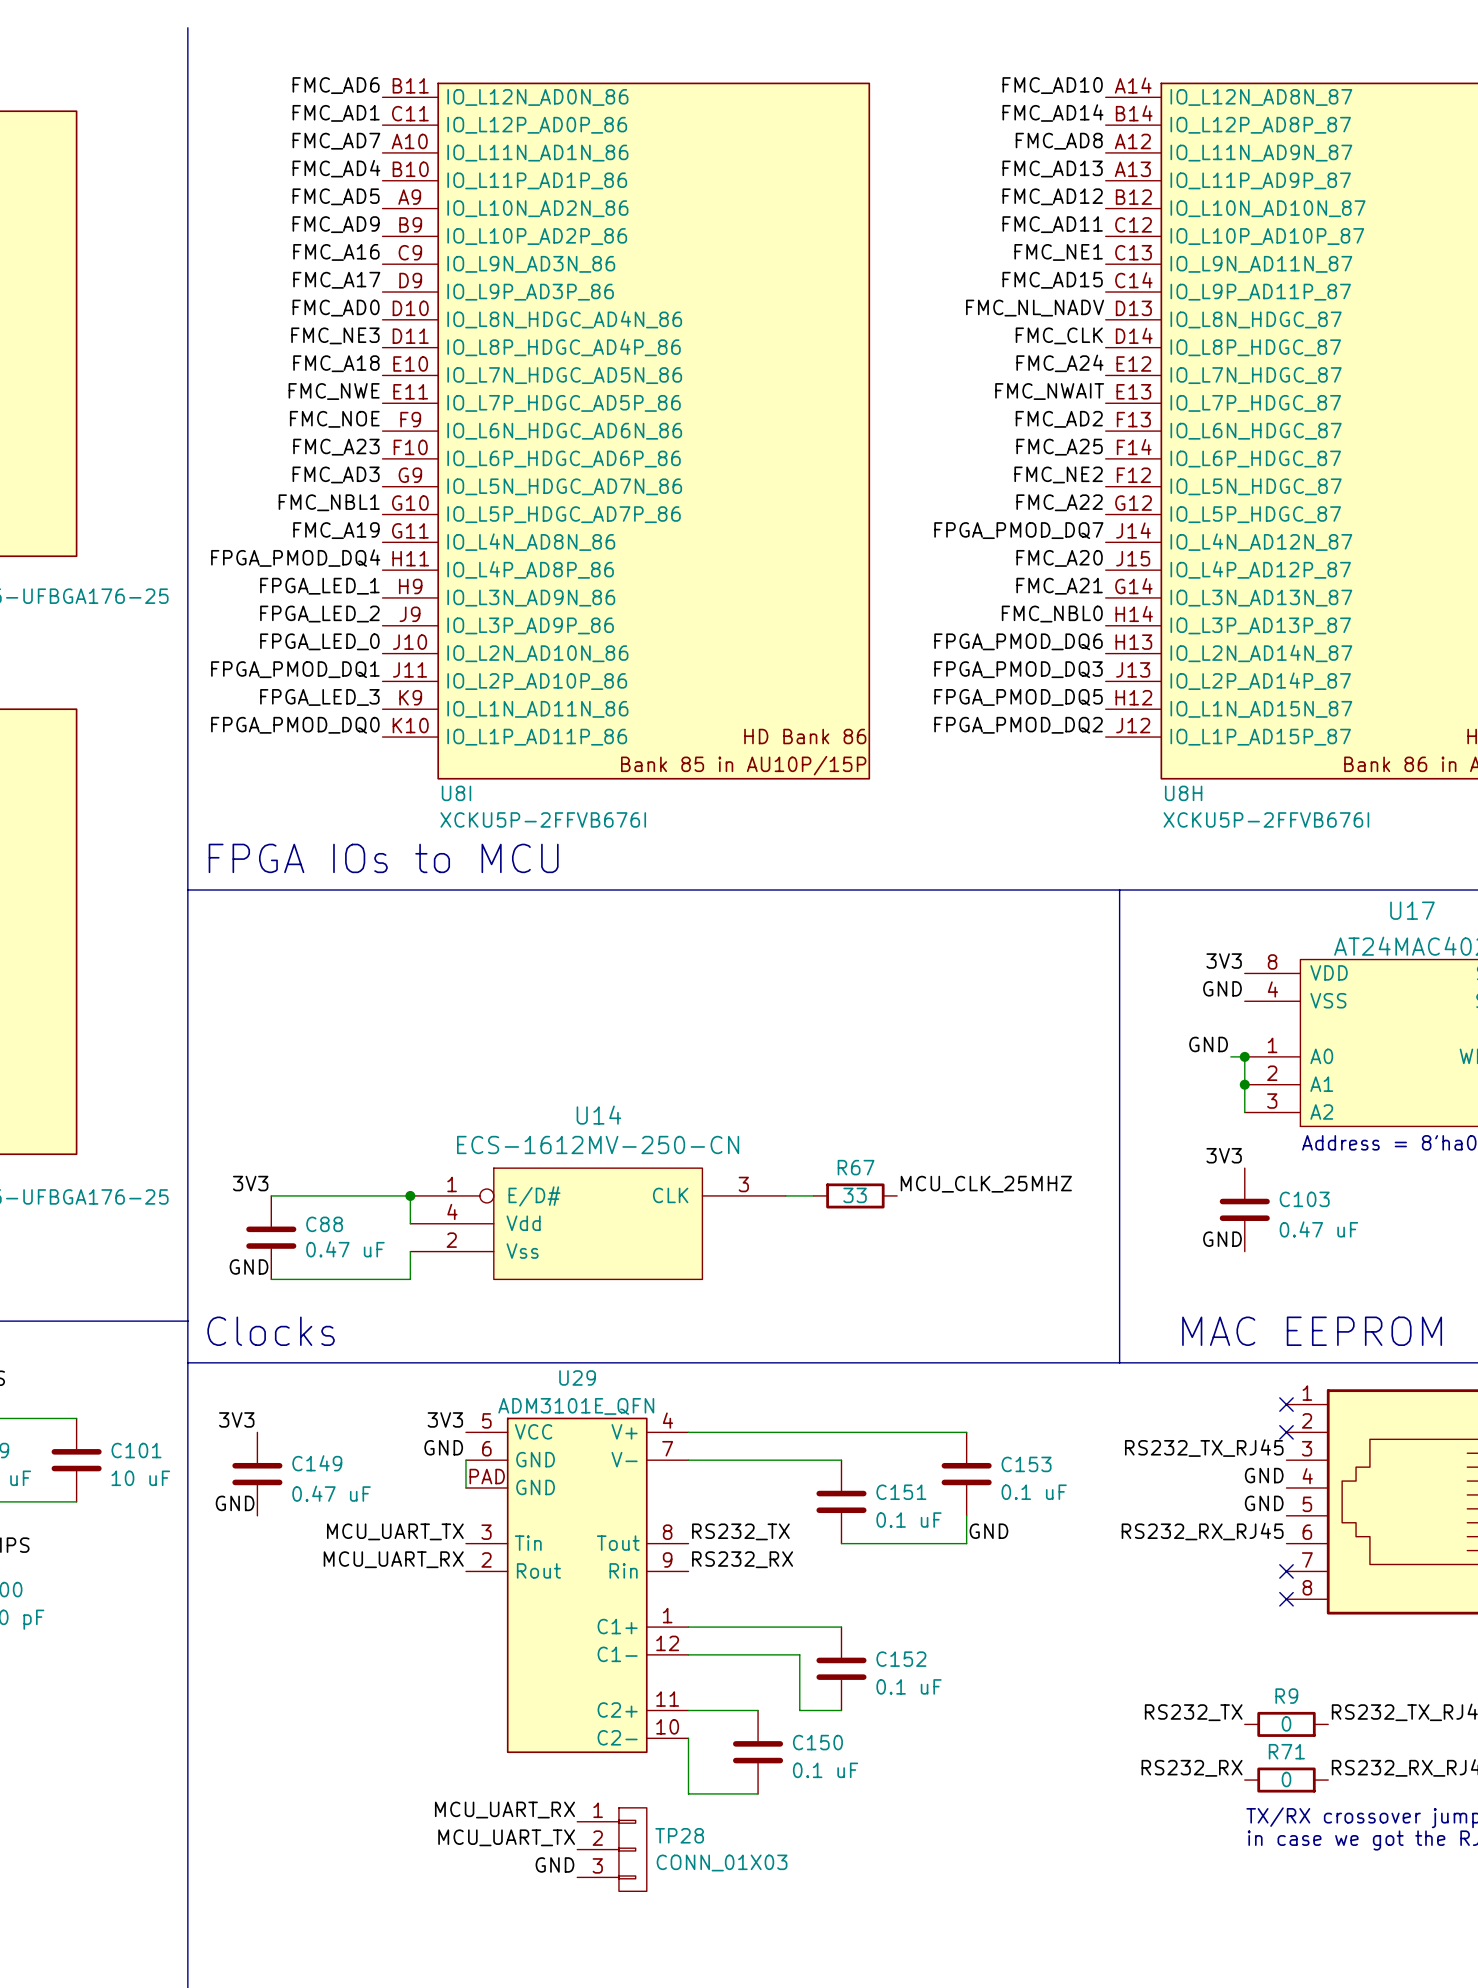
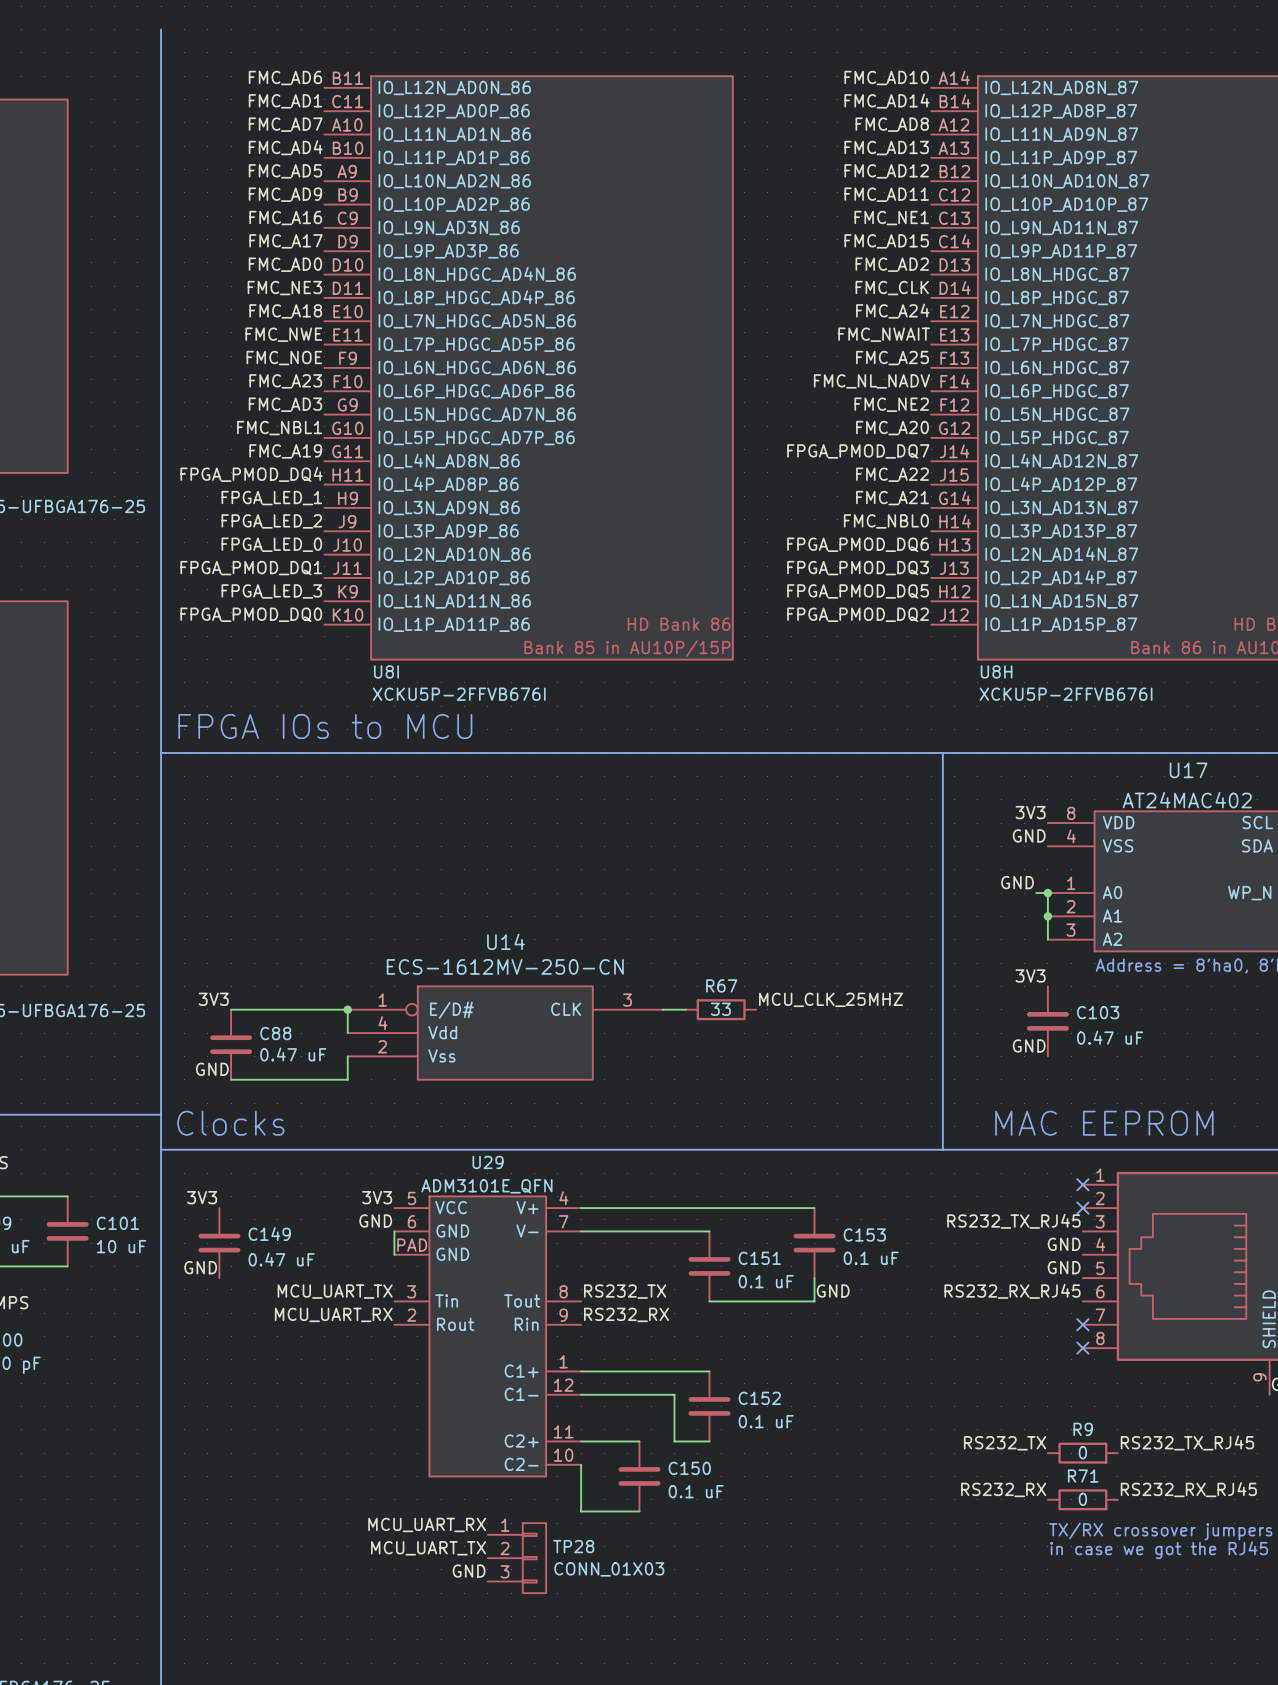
label: FMC_NL_NADV (1035, 308) -> FMC_AD2 (892, 264)
label: FMC_AD2 (1059, 419) -> FMC_A25 (892, 358)
label: FMC_A25 (1059, 447) -> FMC_NL_NADV (871, 381)
label: FMC_A22 (1059, 502) -> FMC_A20 (892, 428)
label: FMC_A20 (1059, 558) -> FMC_A22 (892, 474)

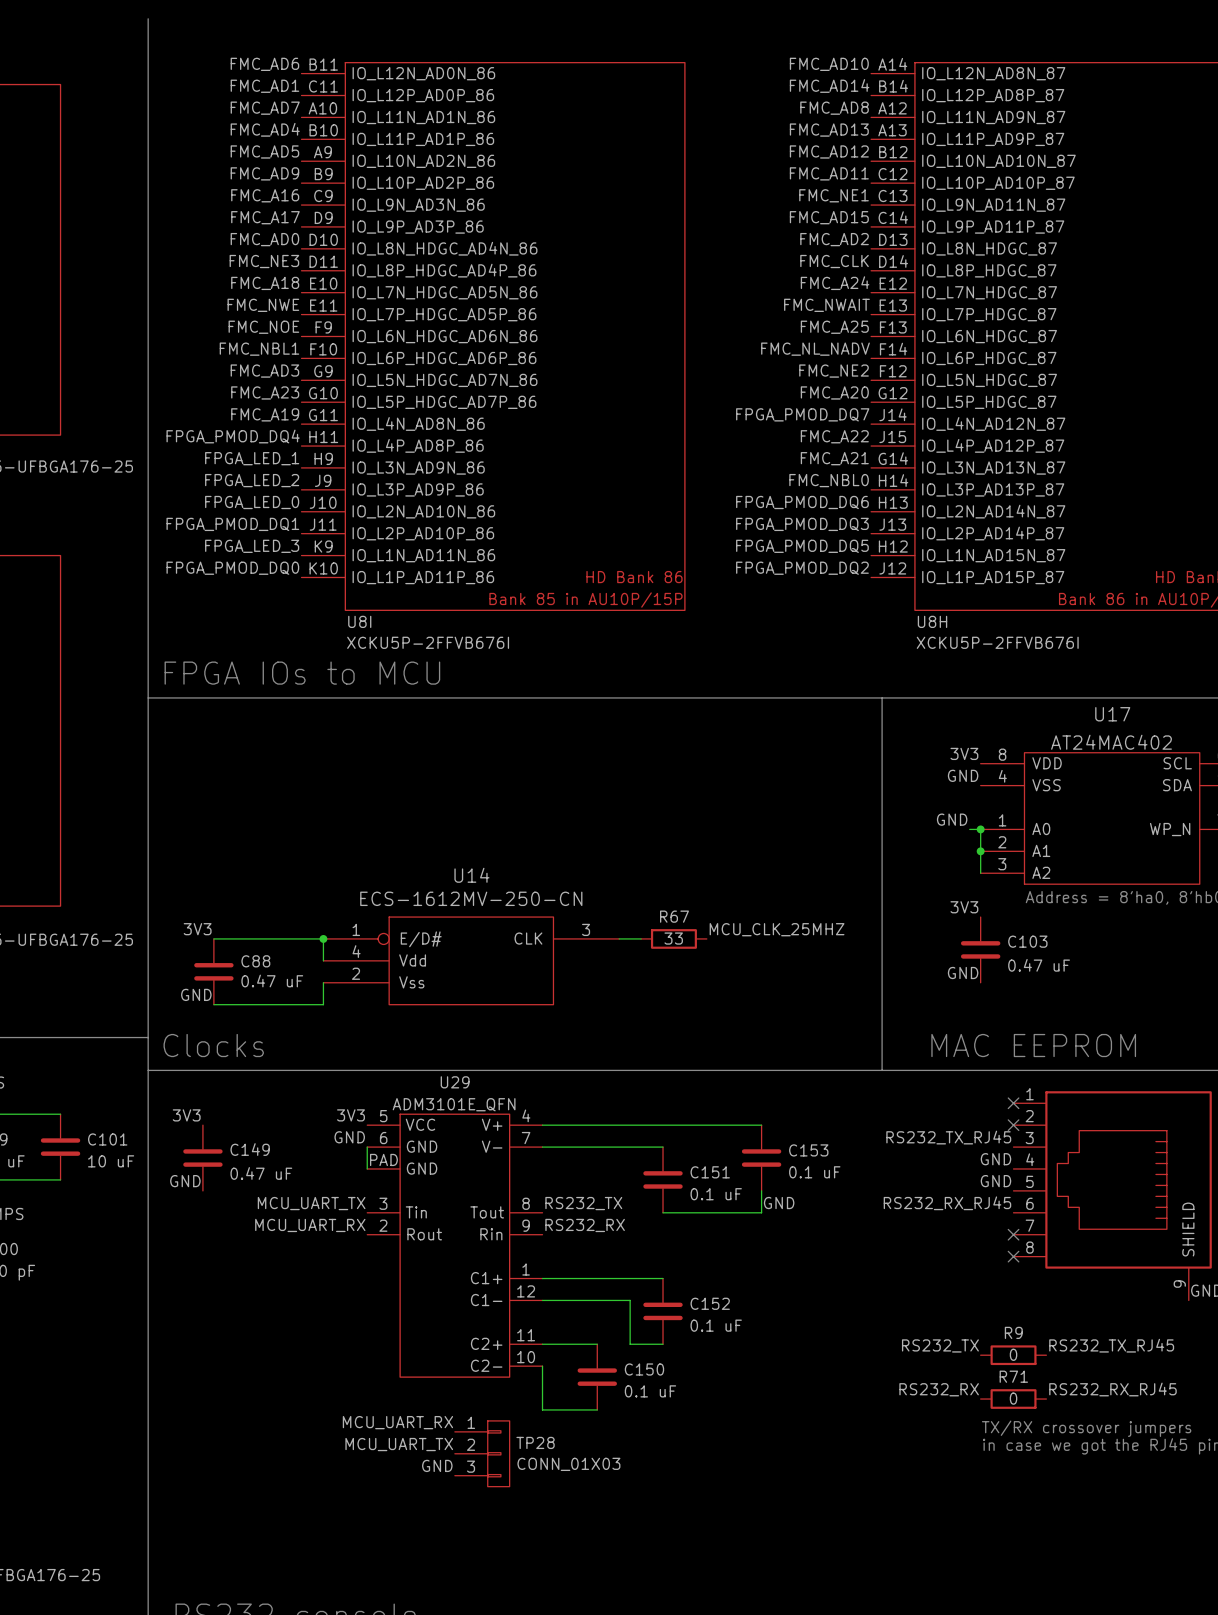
label: FMC_A23 (285, 381) -> FMC_NBL1 (259, 349)
label: FMC_NBL1 (279, 428) -> FMC_A23 (265, 392)

